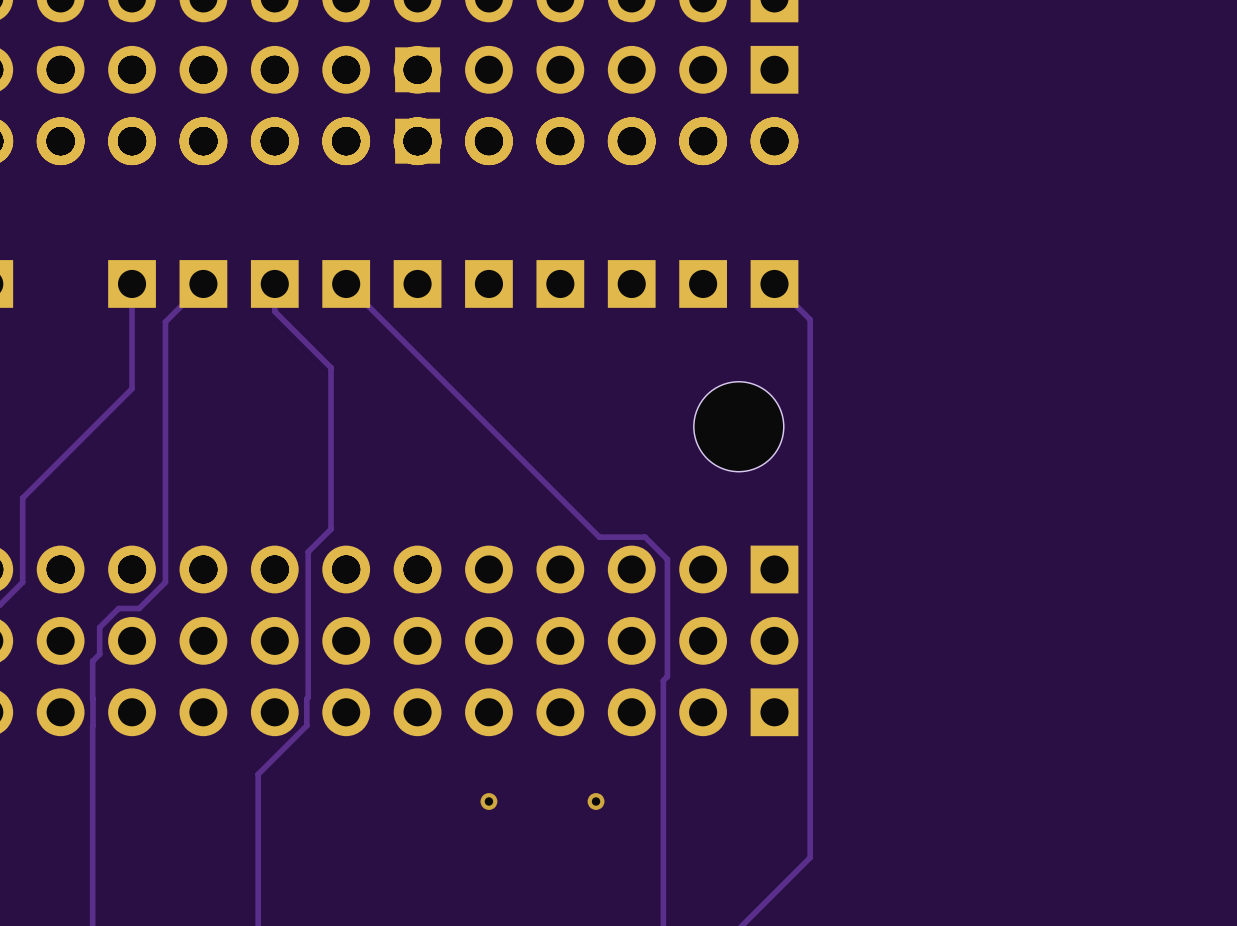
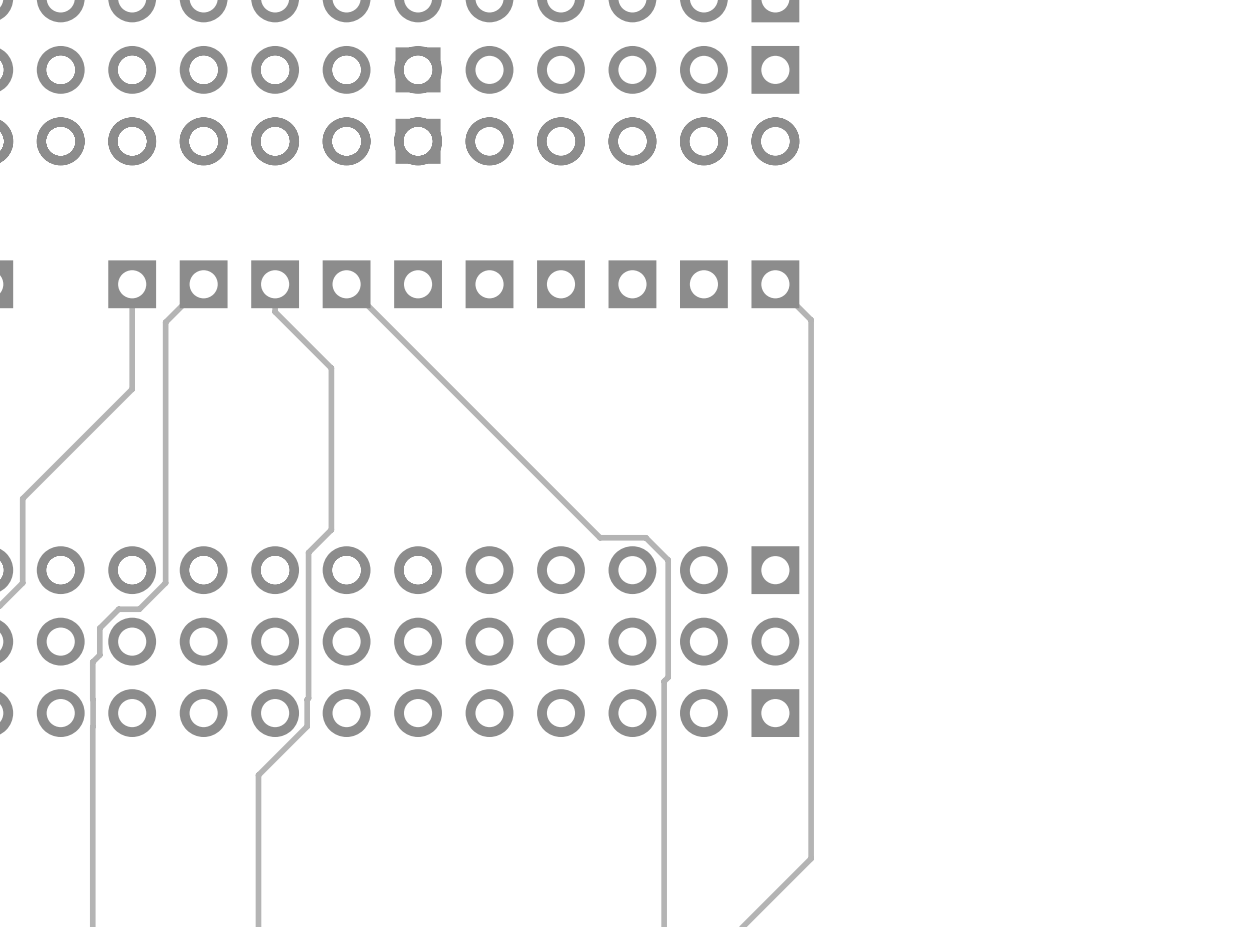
part: (738, 426) -> none
via: (488, 801) -> none
via: (596, 801) -> none

